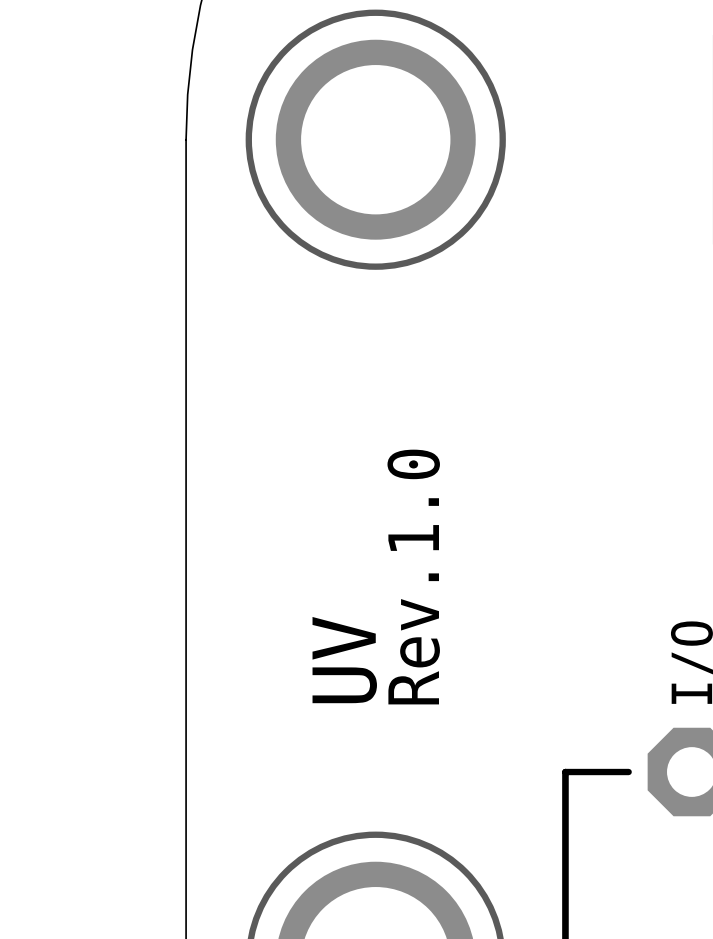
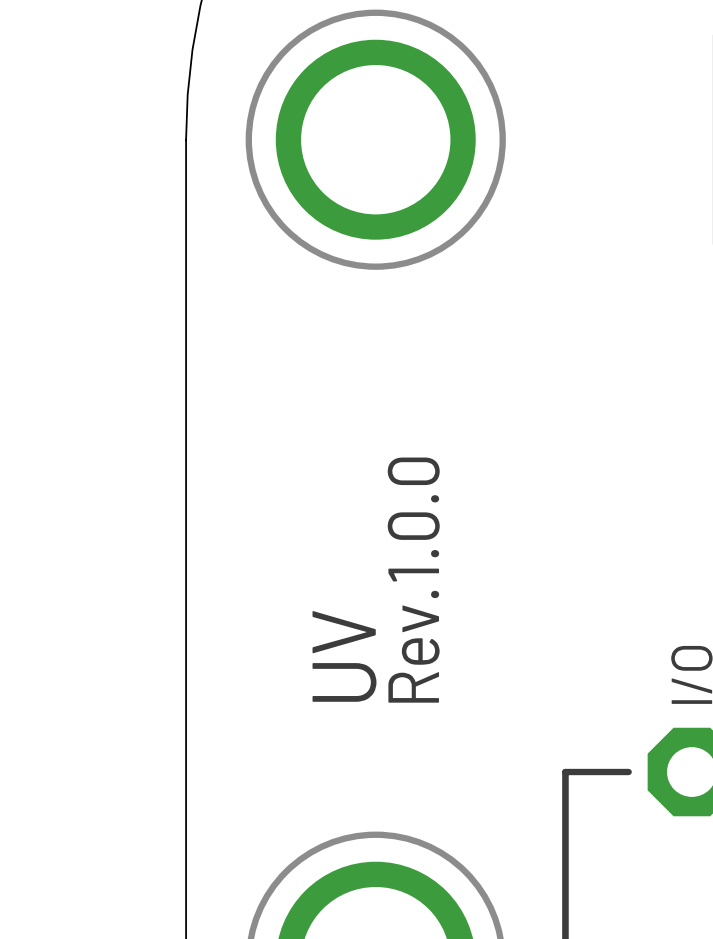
text: Rev.1.0 (413, 577) -> Rev.1.0.0 (413, 580)

